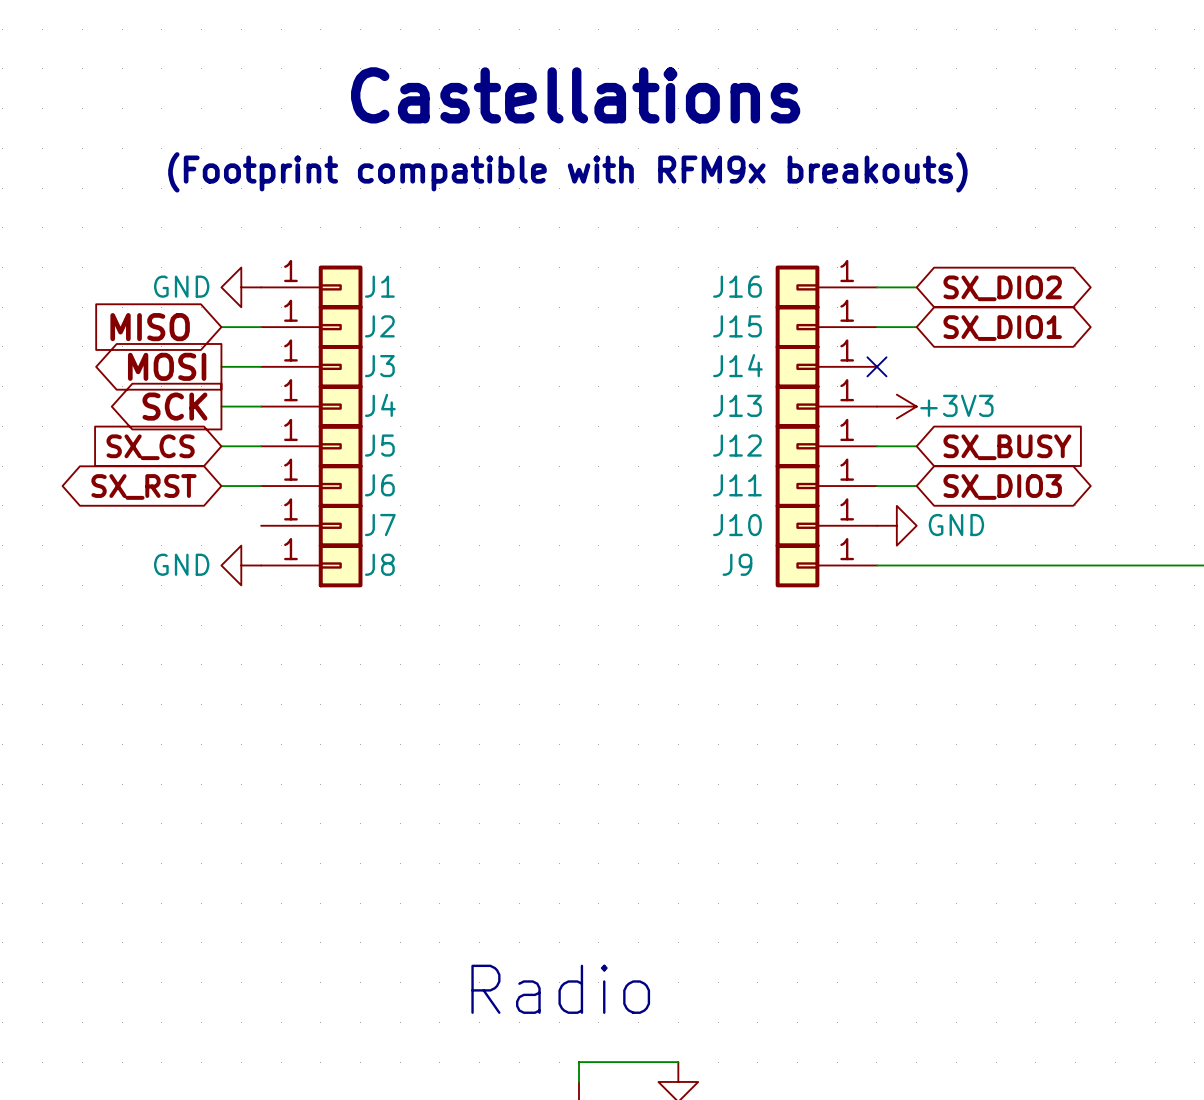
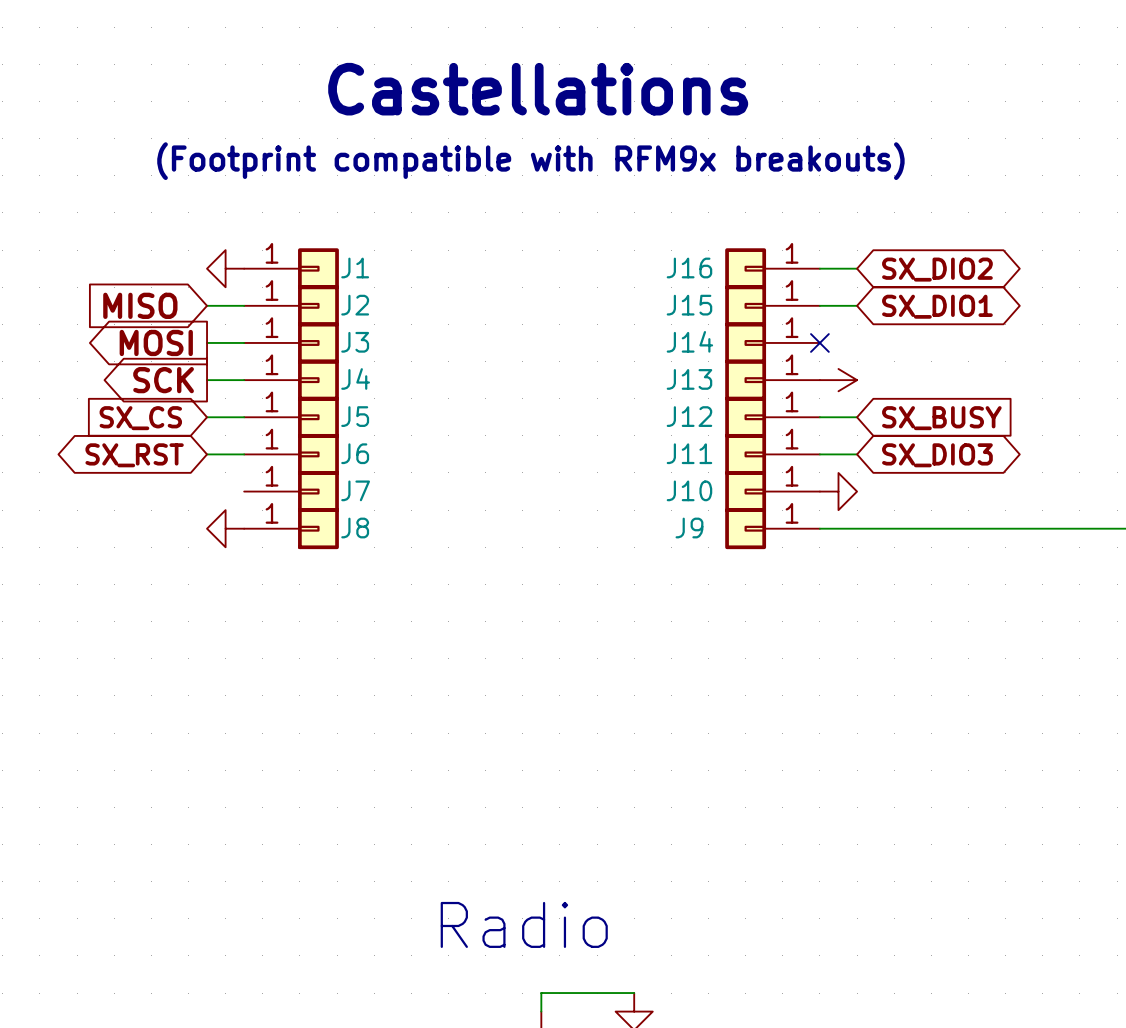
power symbol text: GND (181, 286) -> none
power symbol text: +3V3 (956, 405) -> none
power symbol text: GND (956, 525) -> none
power symbol text: GND (181, 564) -> none

